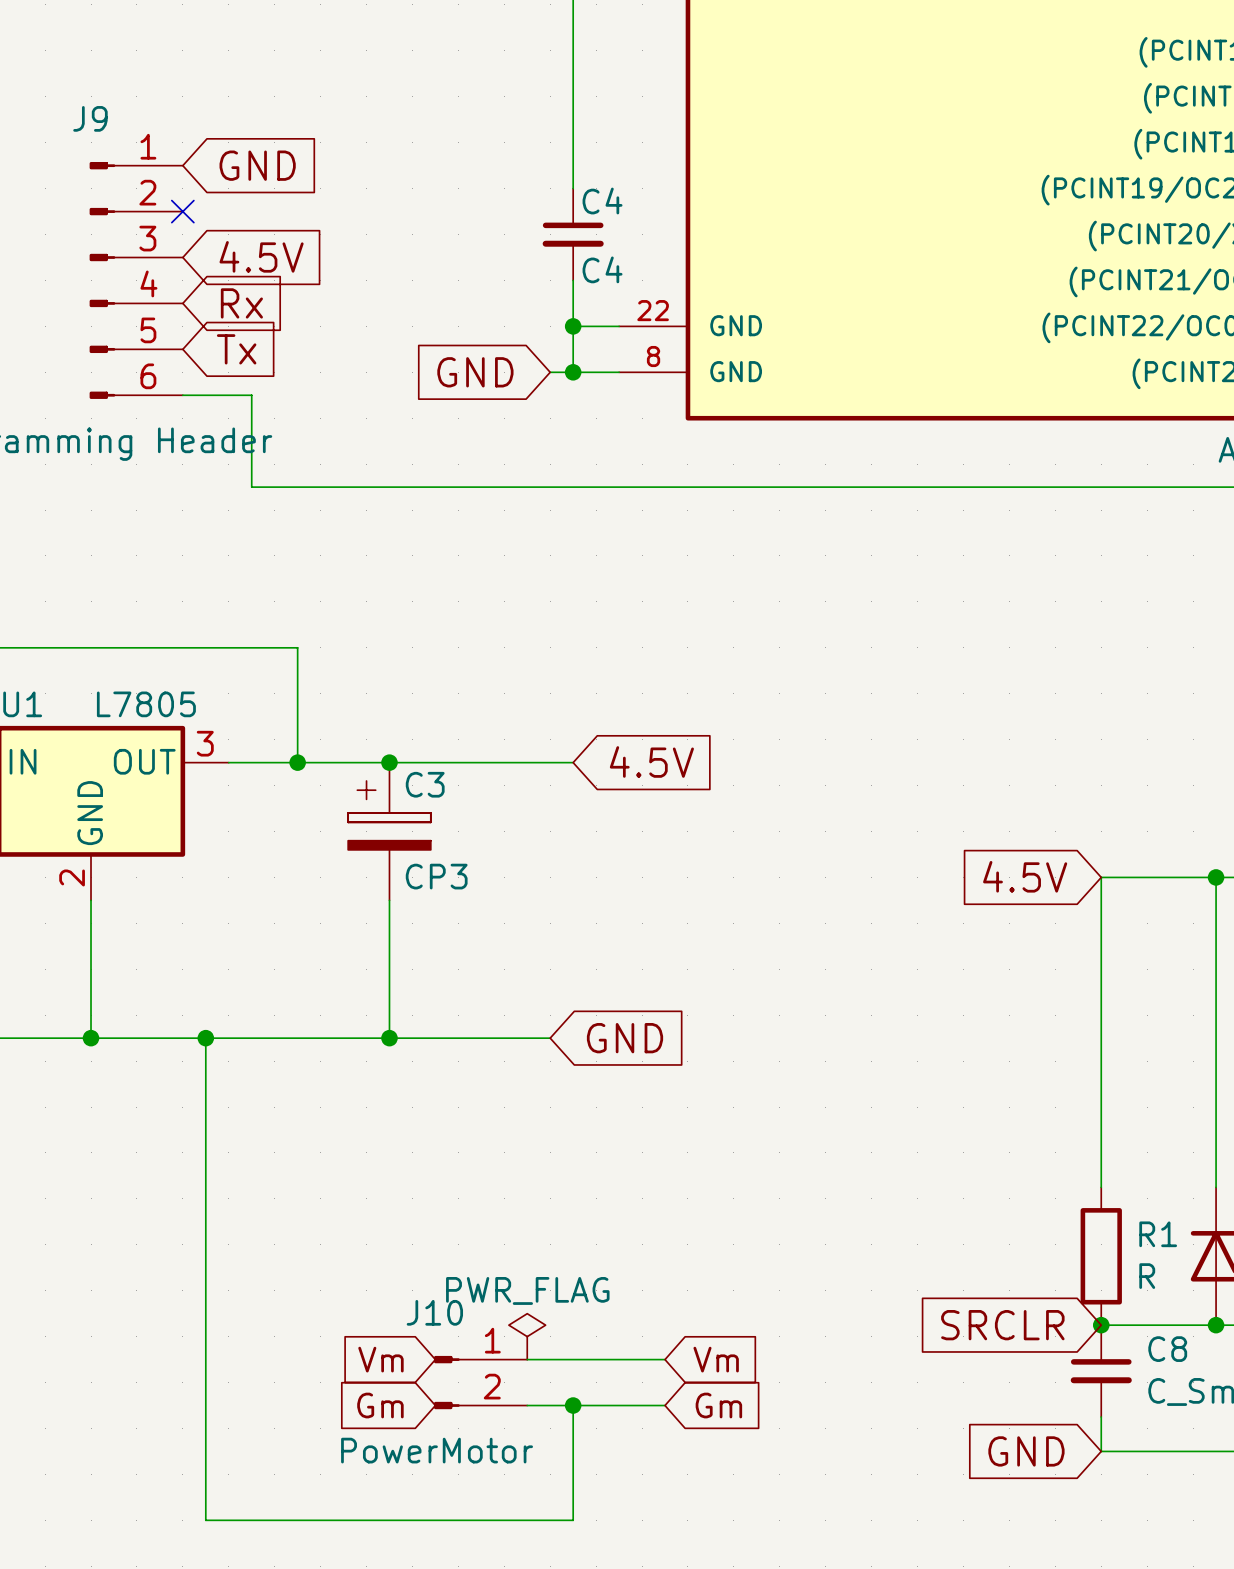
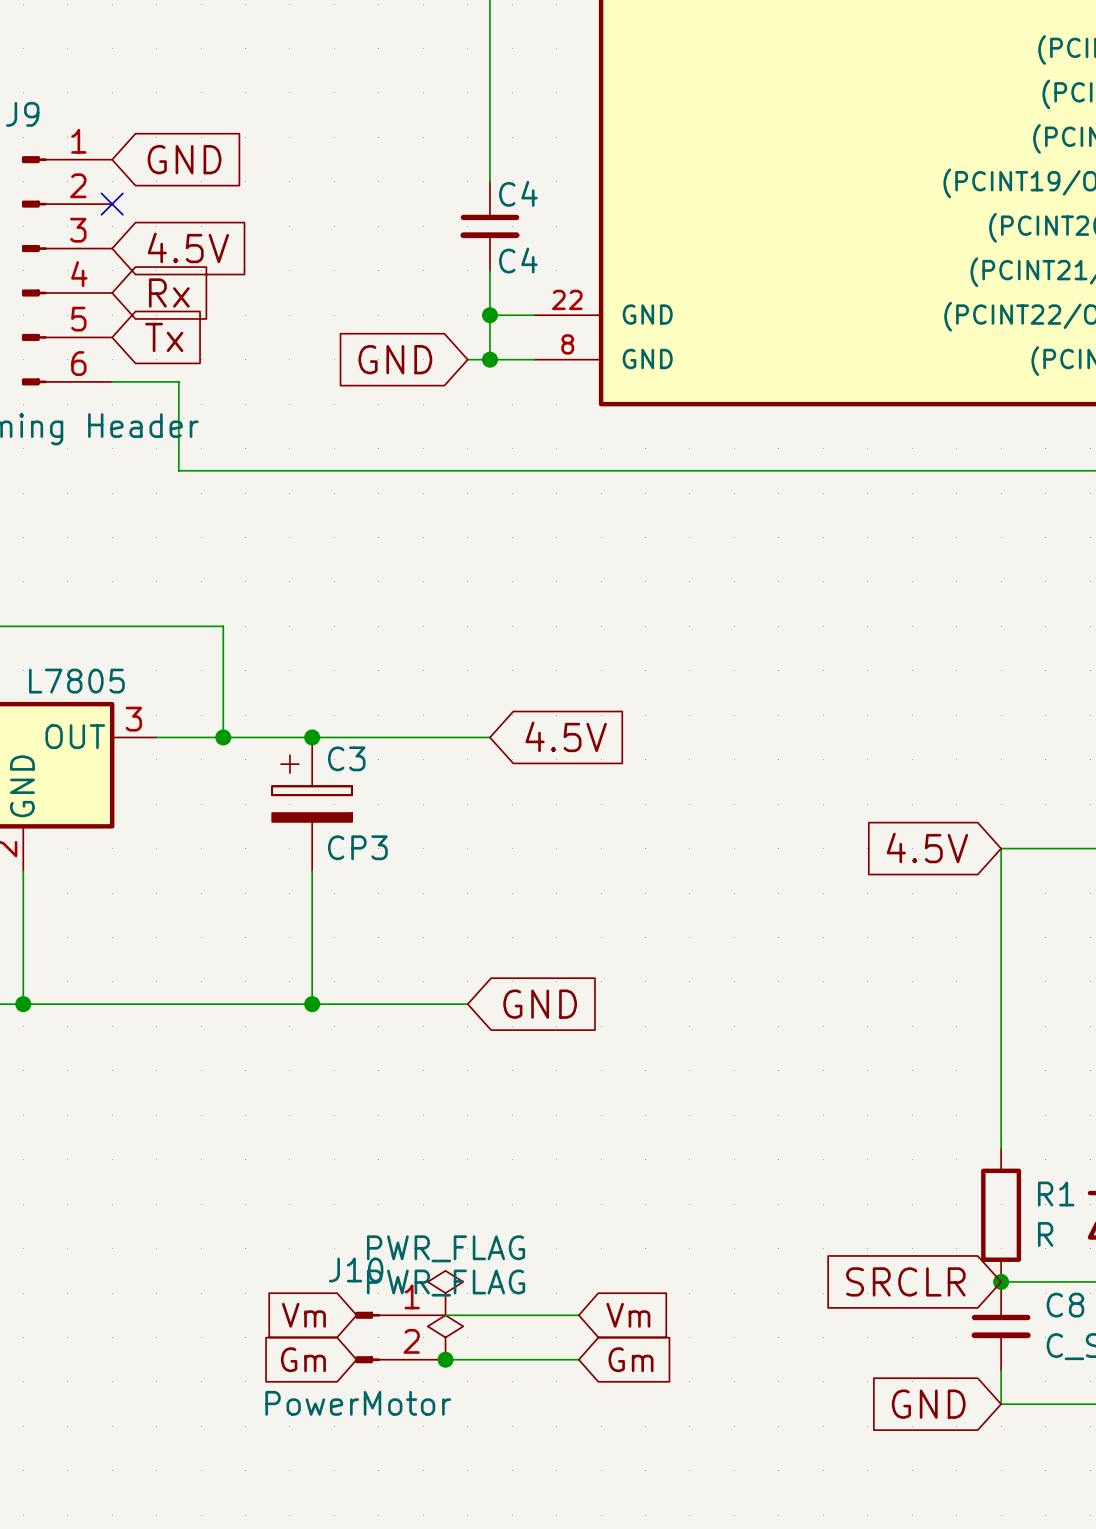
wire: (205, 1038) (205, 1520) (573, 1520) (573, 1405) -> none
junction: (205, 1038) -> none
power symbol: none -> PWR_FLAG (445, 1337)
junction position: (573, 1405) -> (445, 1359)

